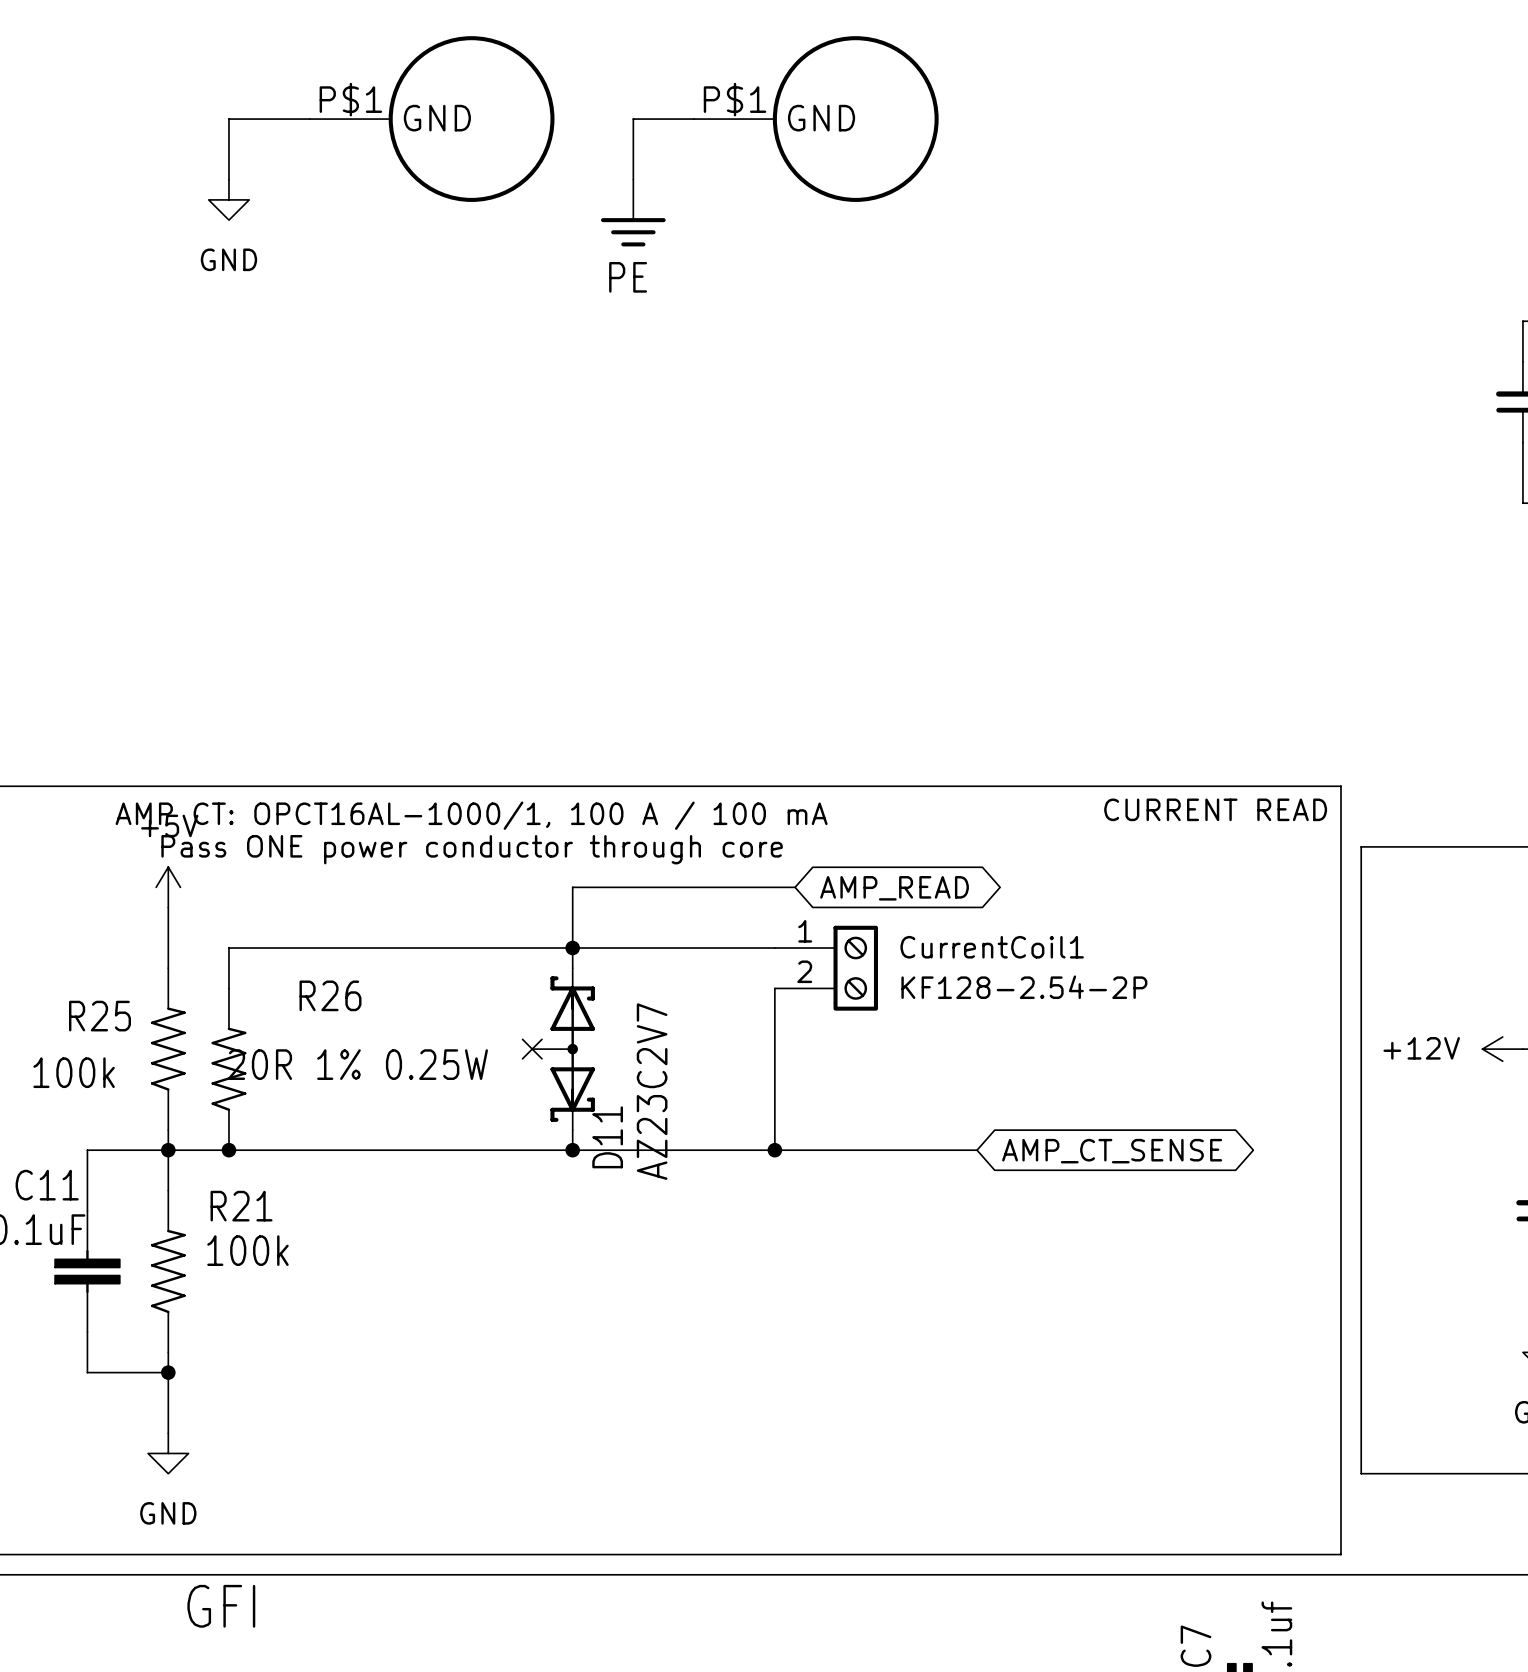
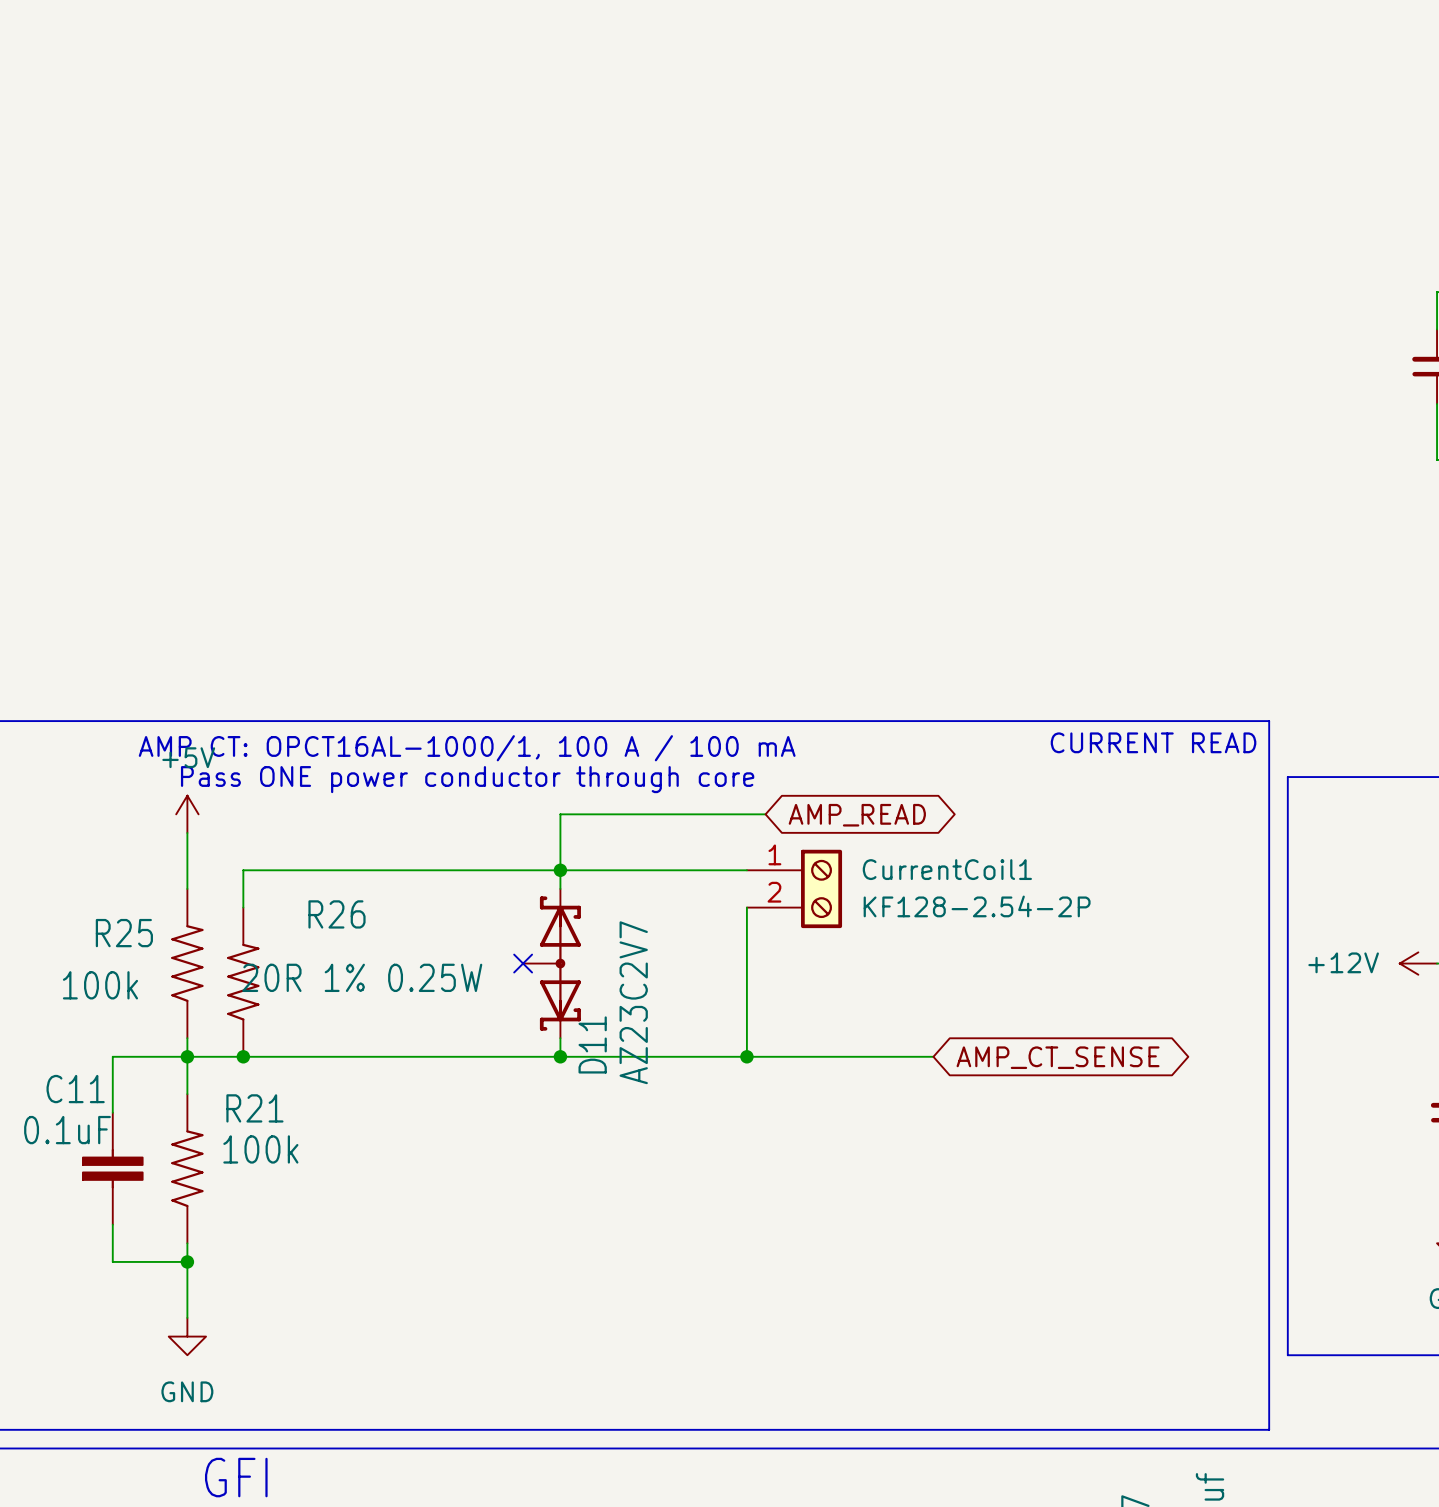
wire: (309, 119) (228, 119) (228, 179) -> none
part: (432, 119) -> none
wire: (694, 119) (633, 119) (633, 179) -> none
part: (816, 119) -> none
power symbol: GND (228, 199) -> none
power symbol: PE (633, 213) -> none

